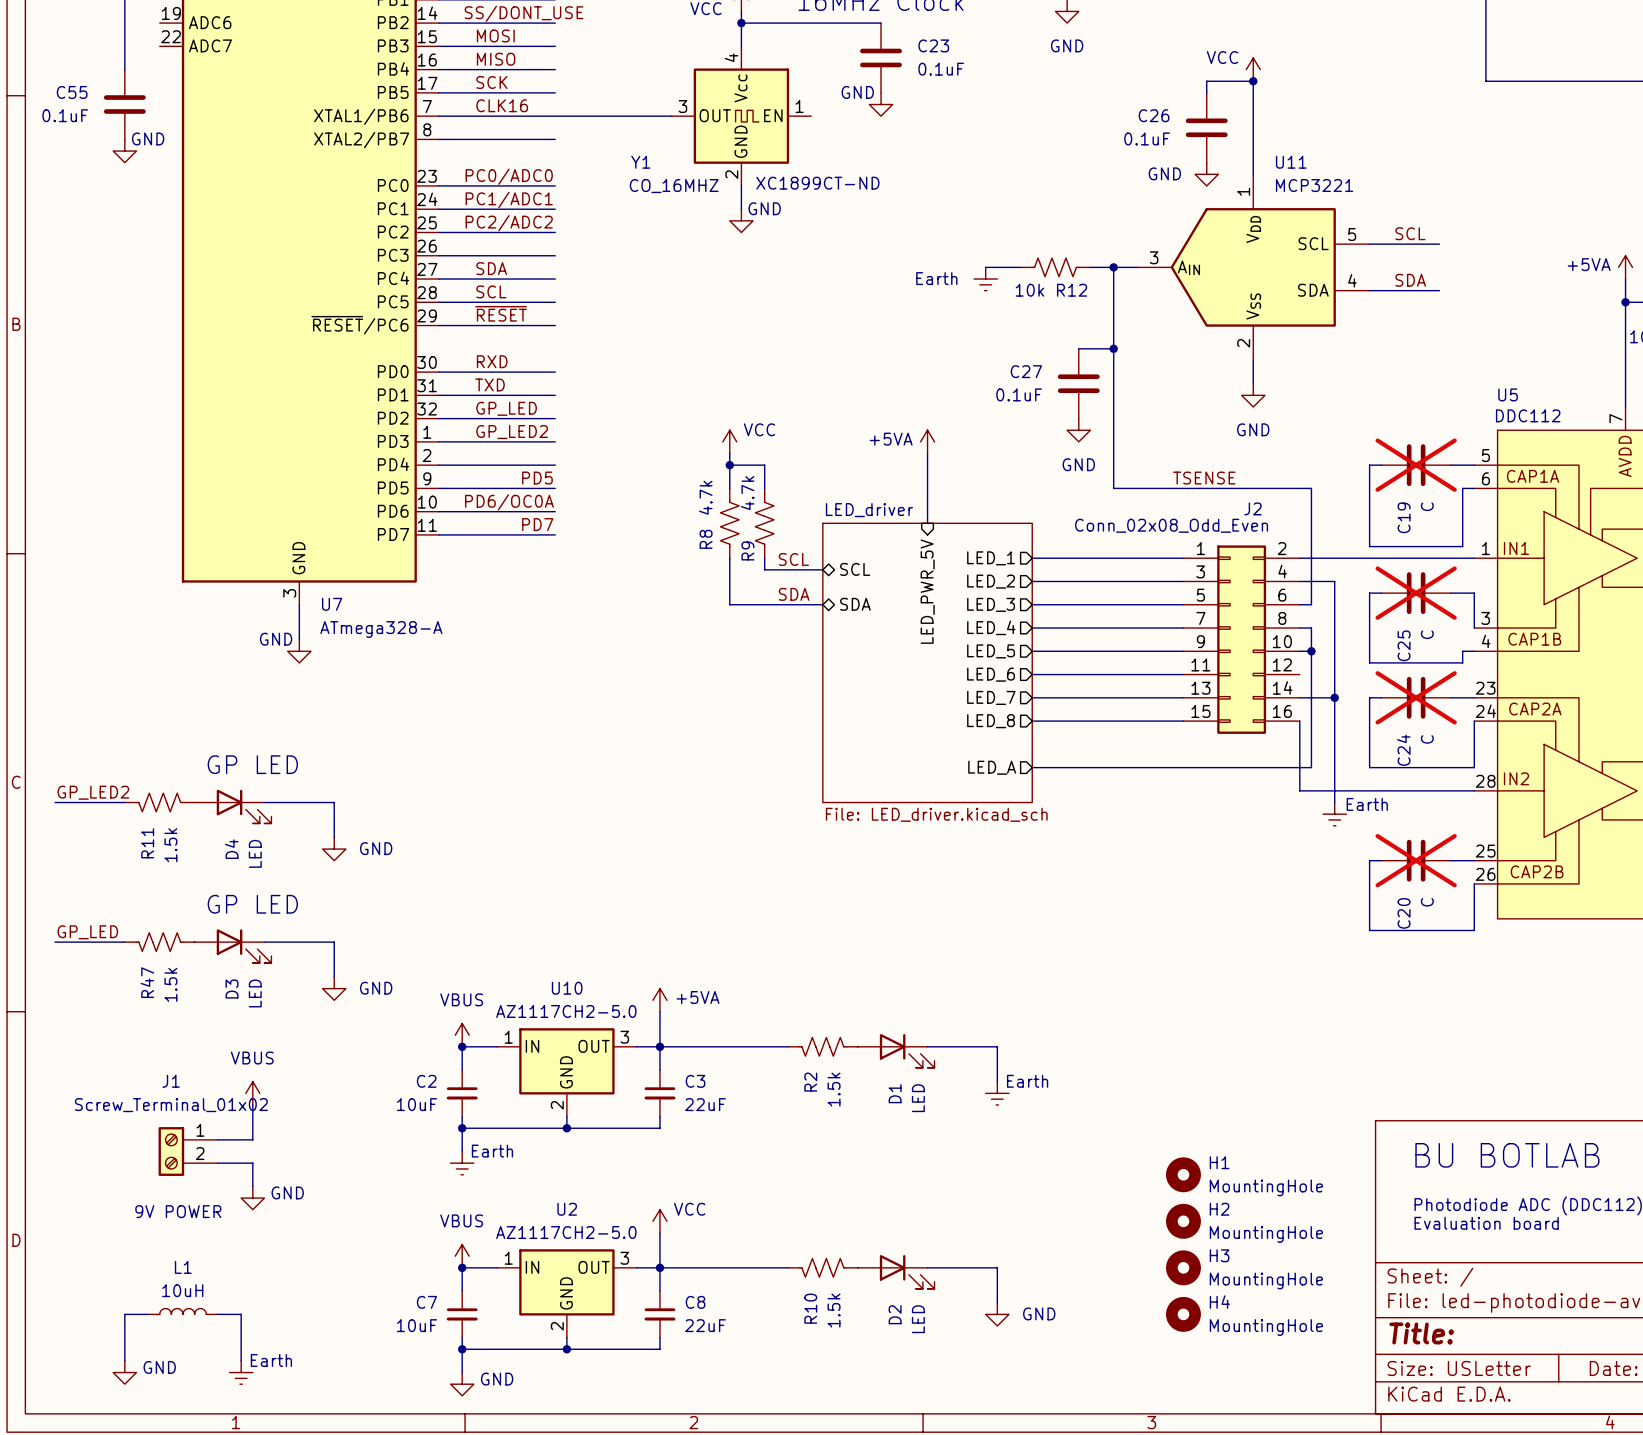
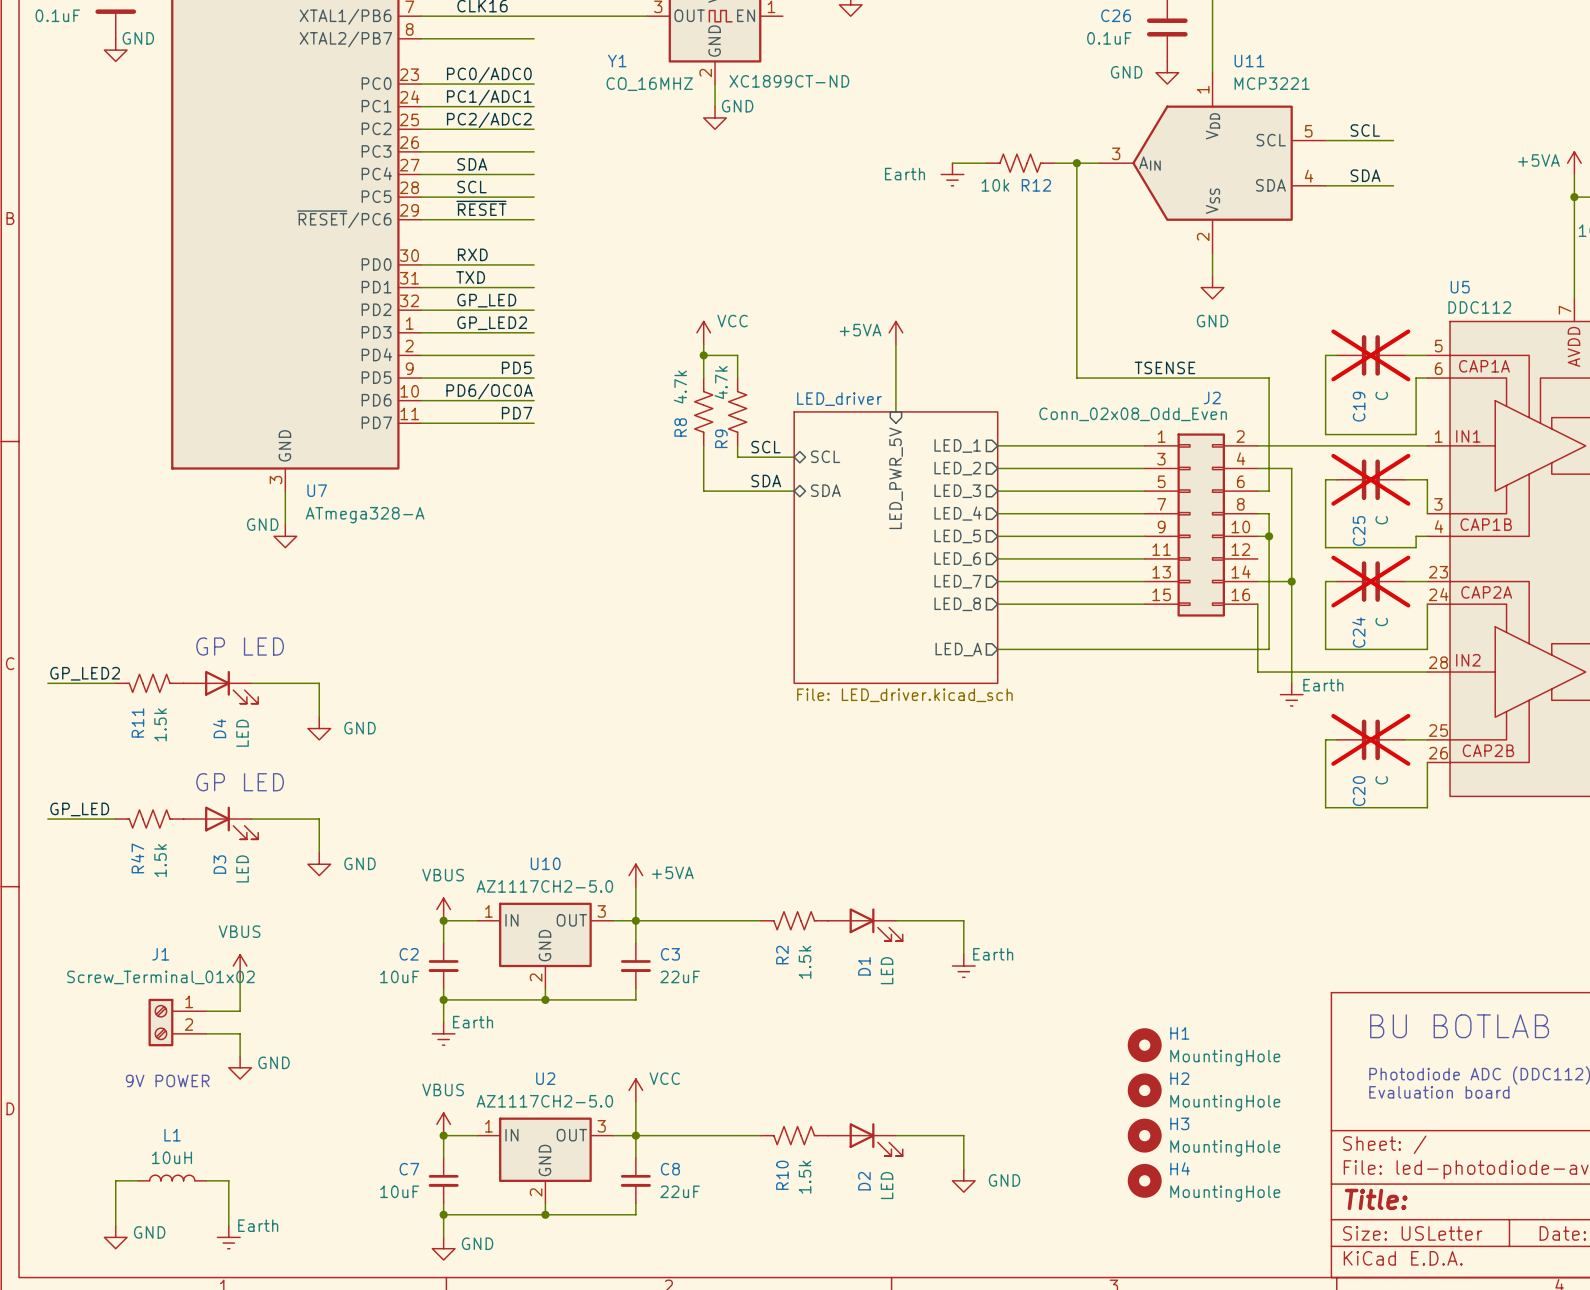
wire: (1078, 348) (1113, 348) -> none
junction: (1113, 348) -> none
C27: 0.1uF (1078, 383) -> none
power symbol: GND (1078, 430) -> none

